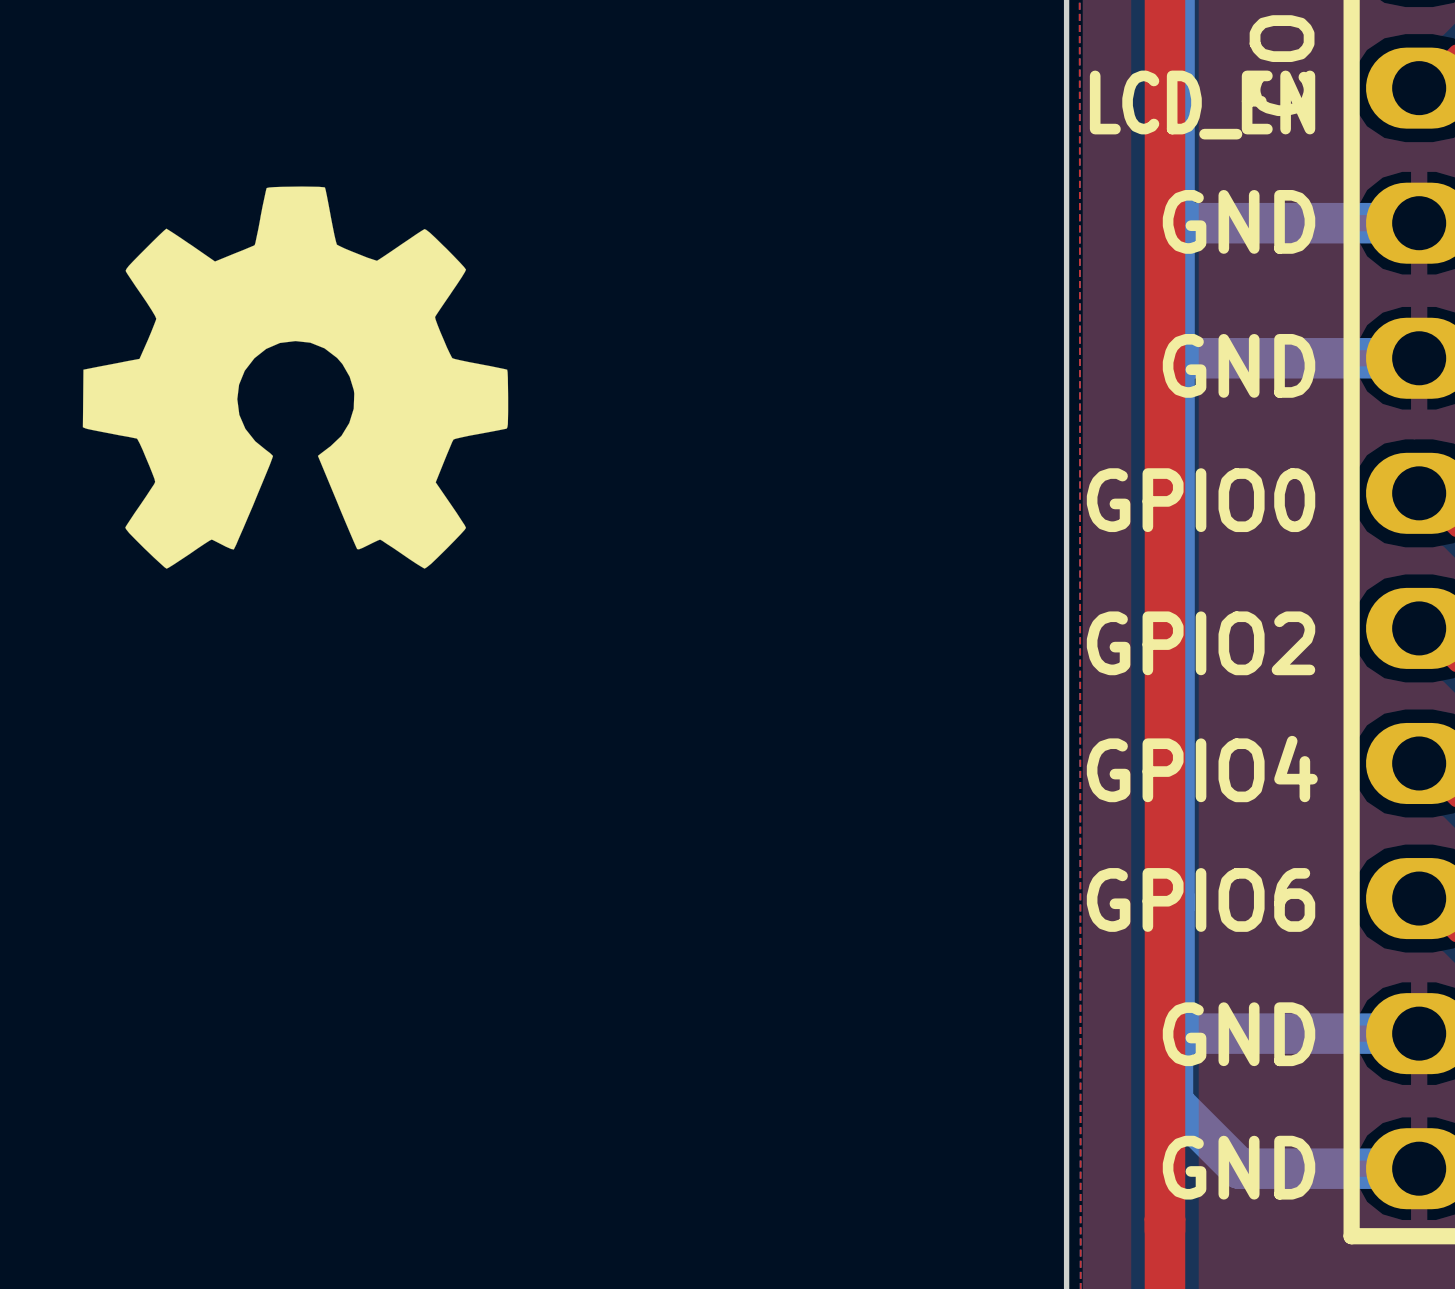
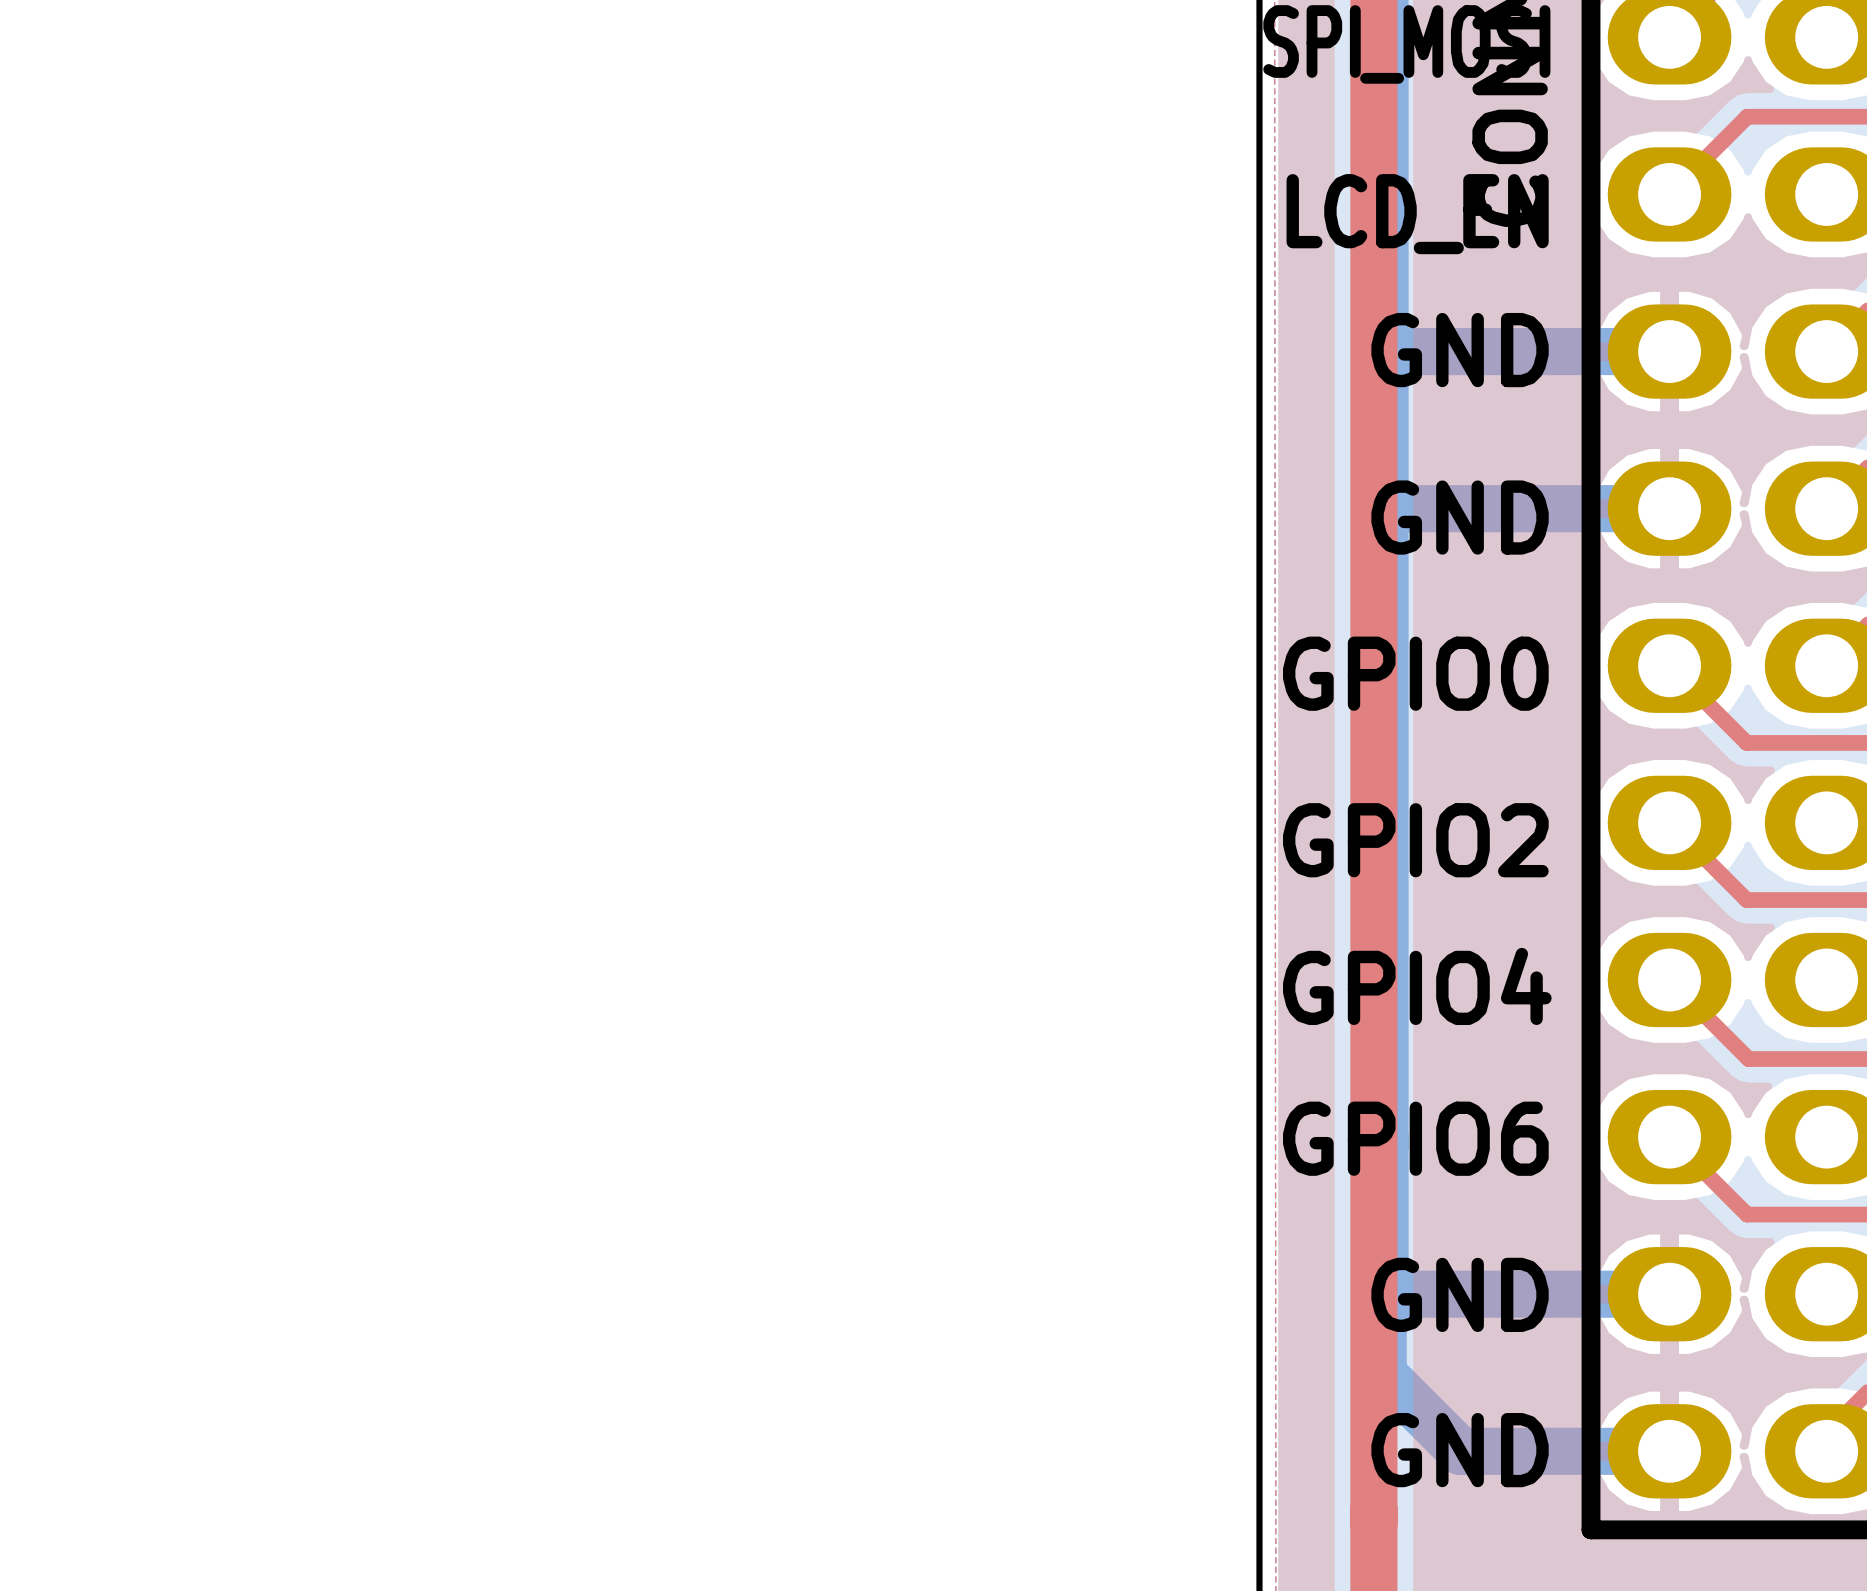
drawing: [82, 186, 509, 569] -> none

